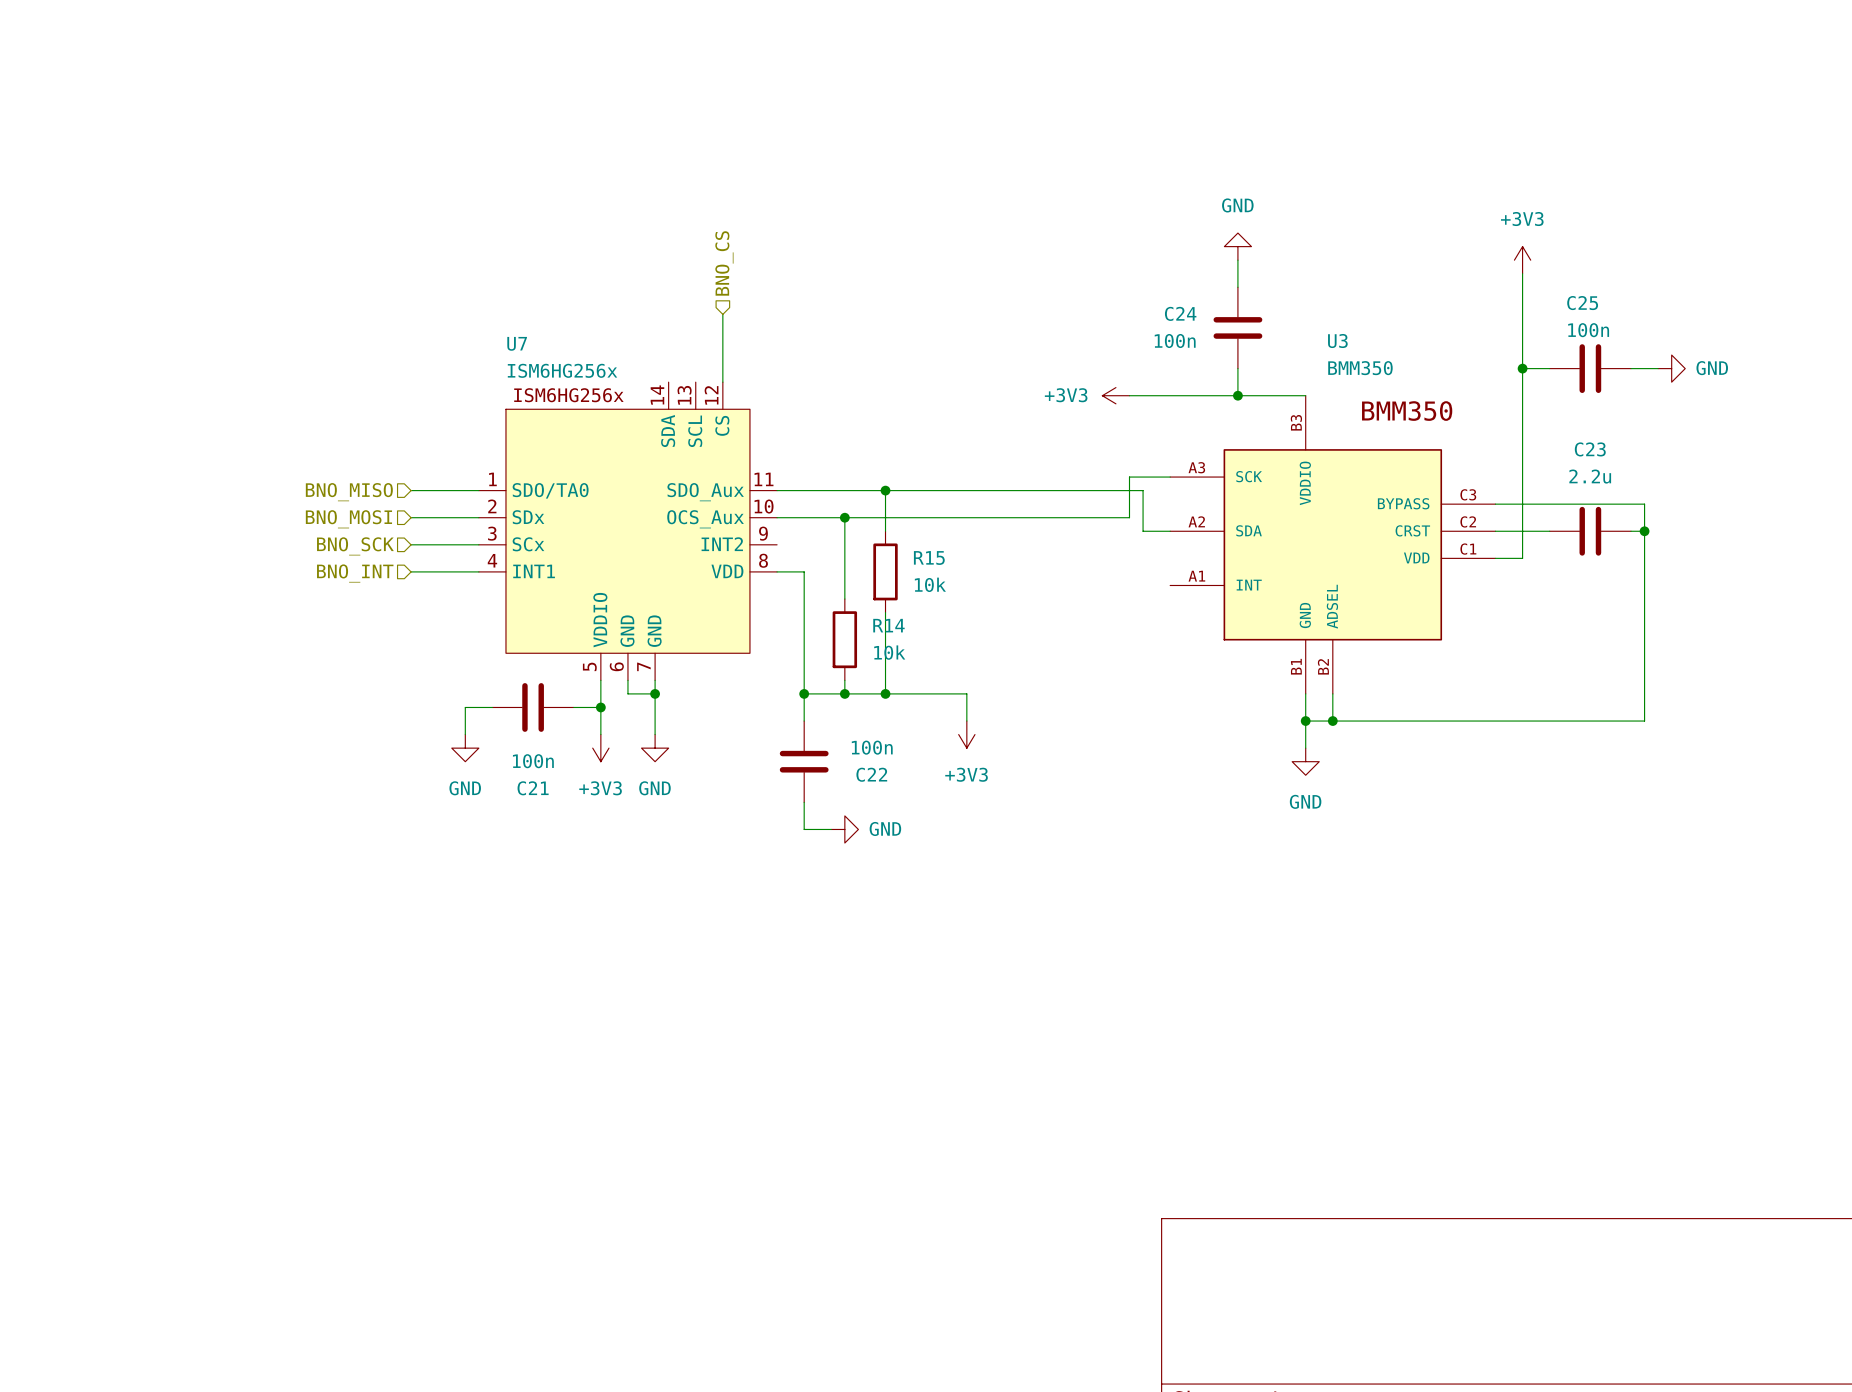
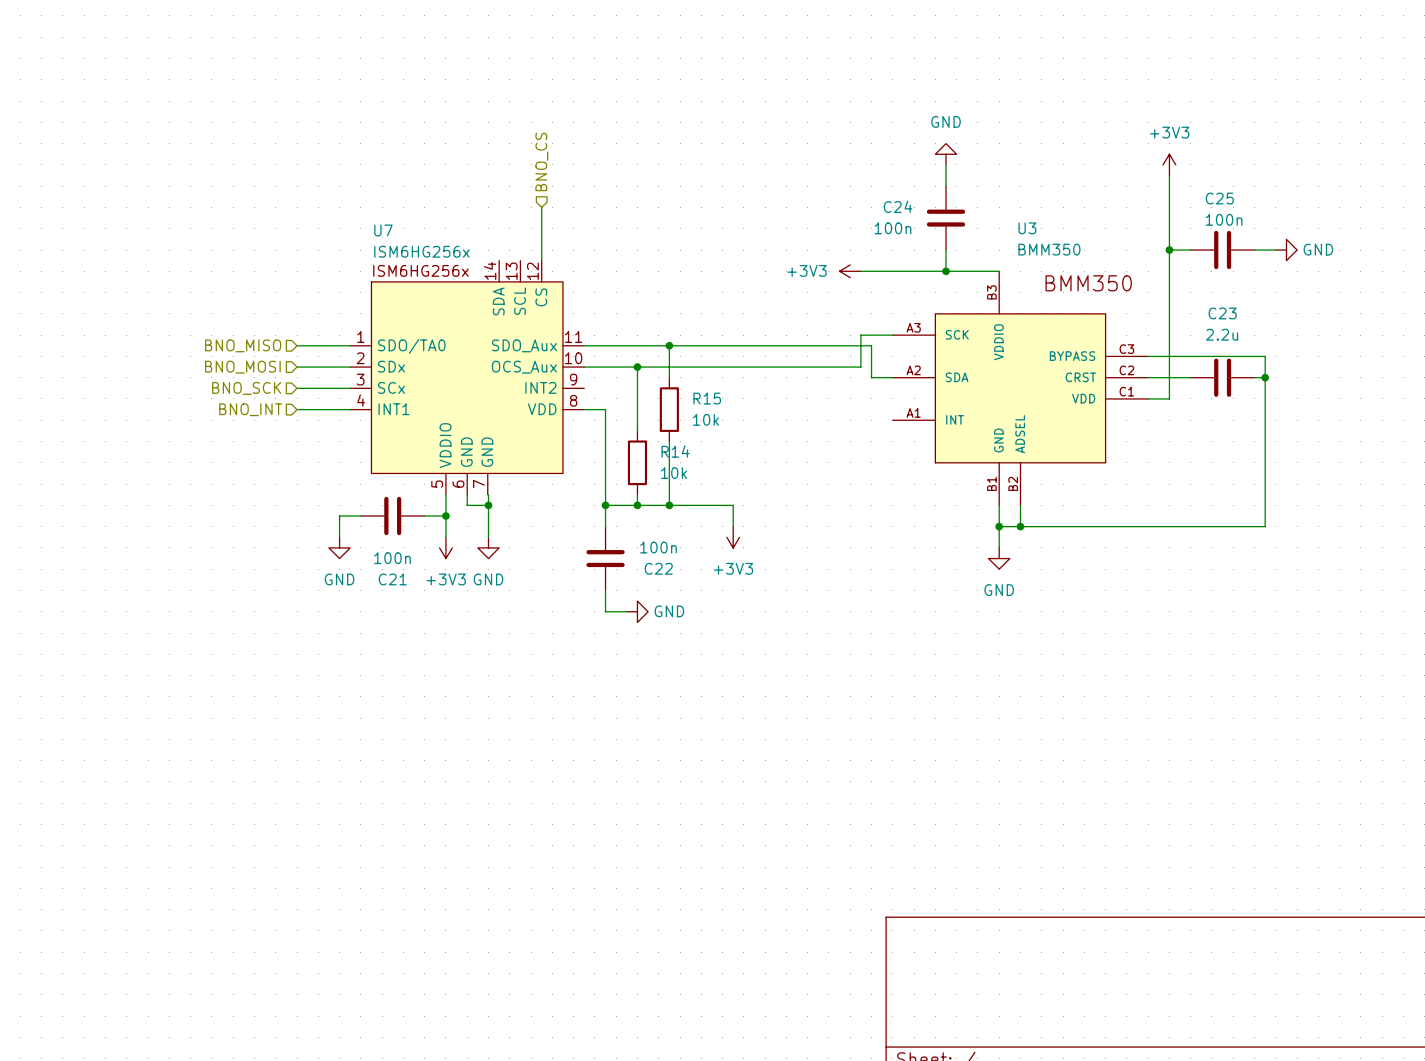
U7 symbol: [478, 382, 778, 681] -> [350, 260, 585, 495]

